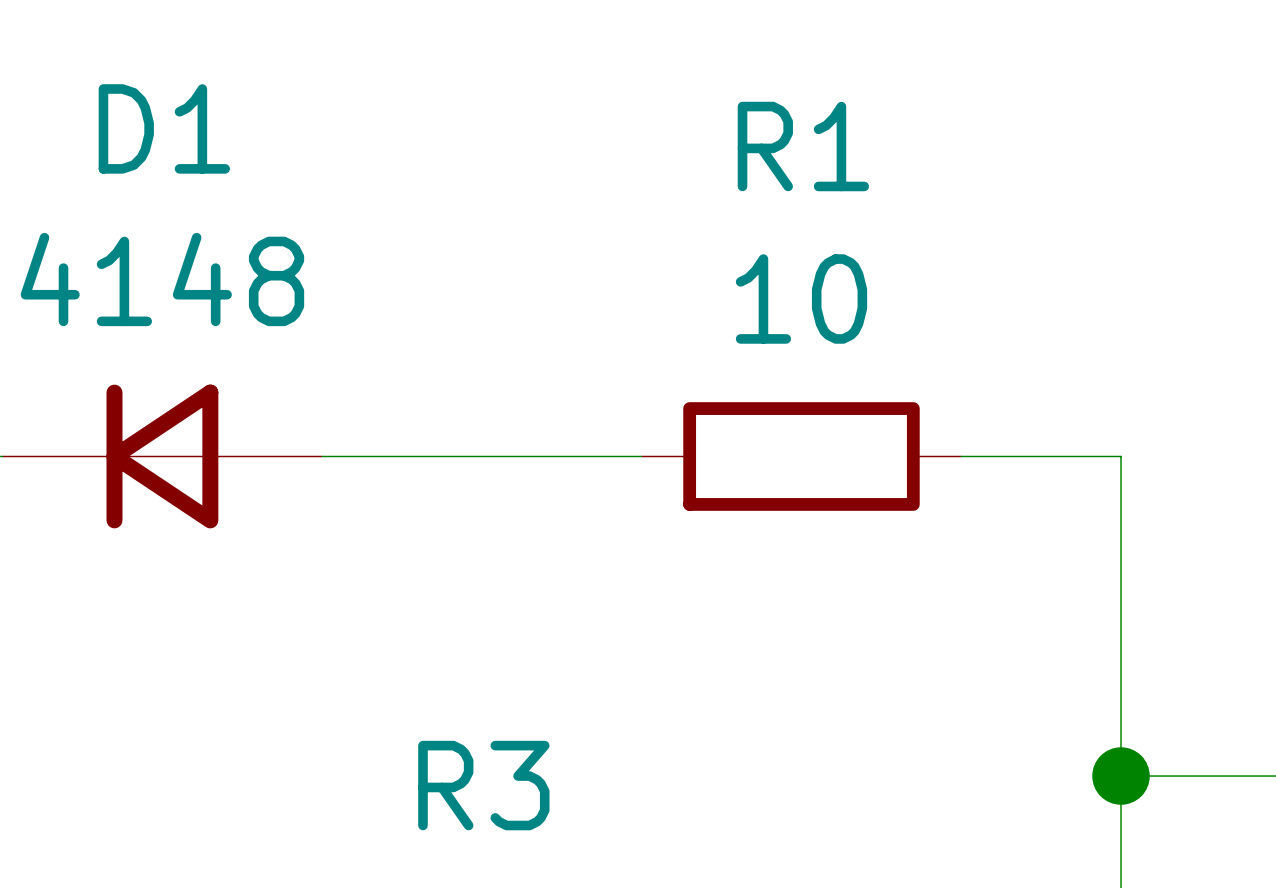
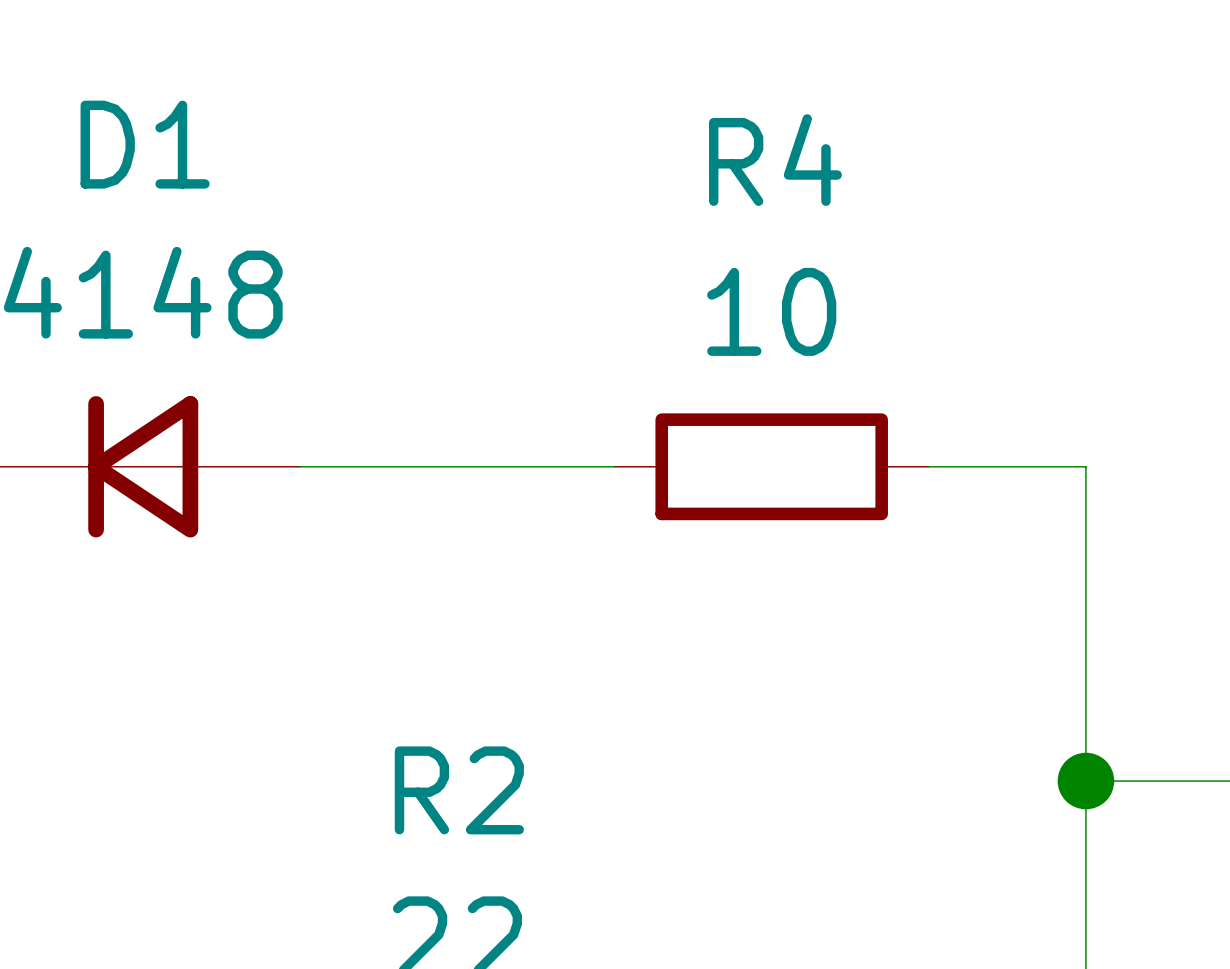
R1 name: R1 (803, 146) -> R4 (775, 160)
R3 name: R3 (483, 785) -> R2 (459, 790)

